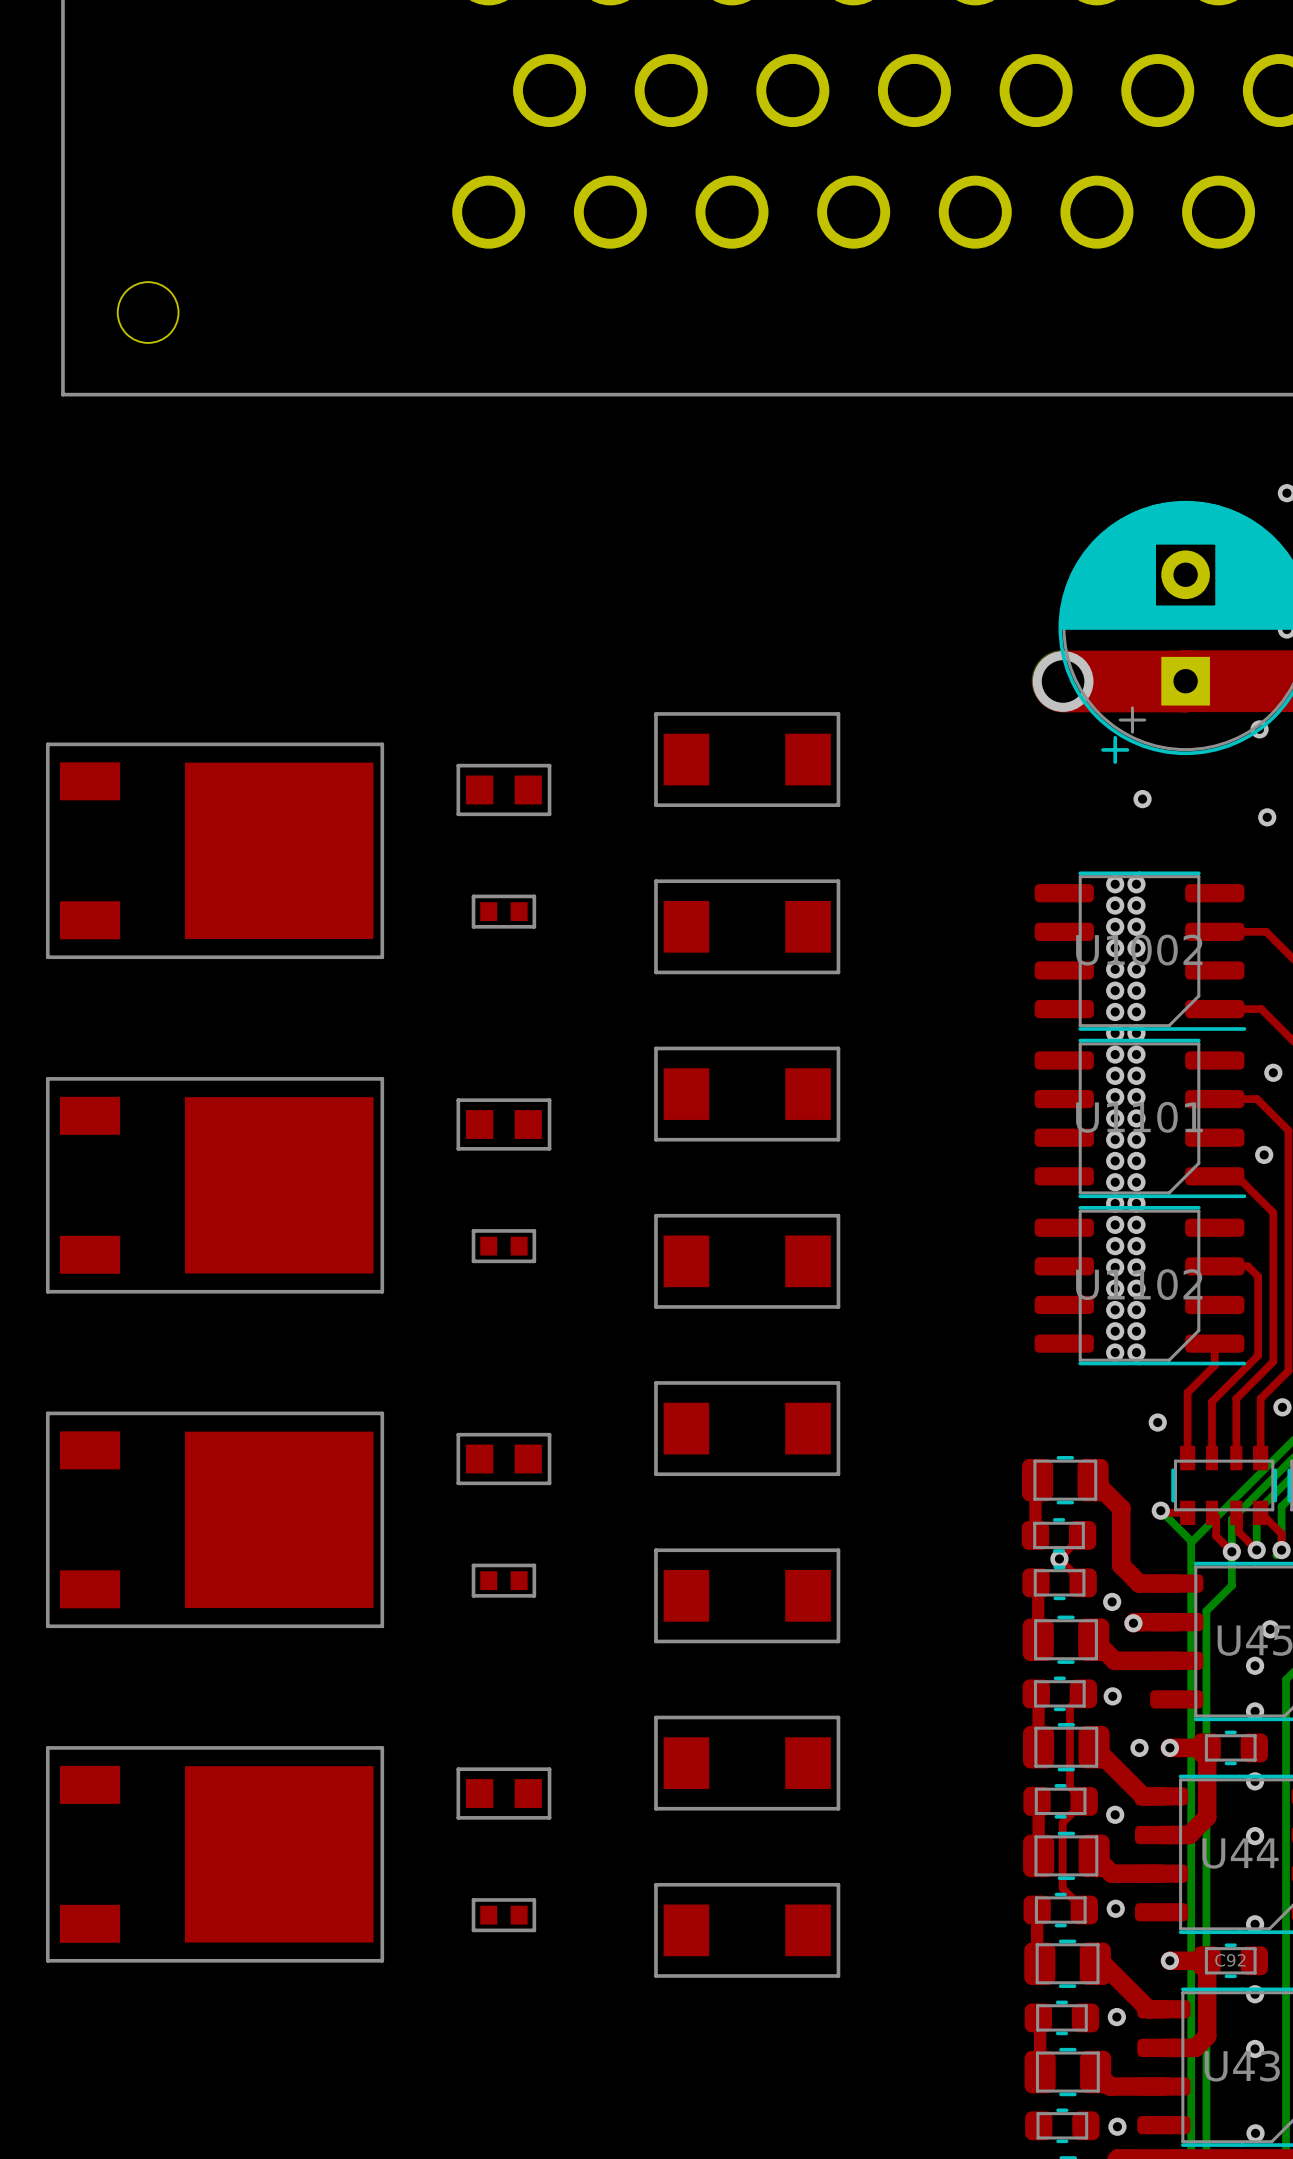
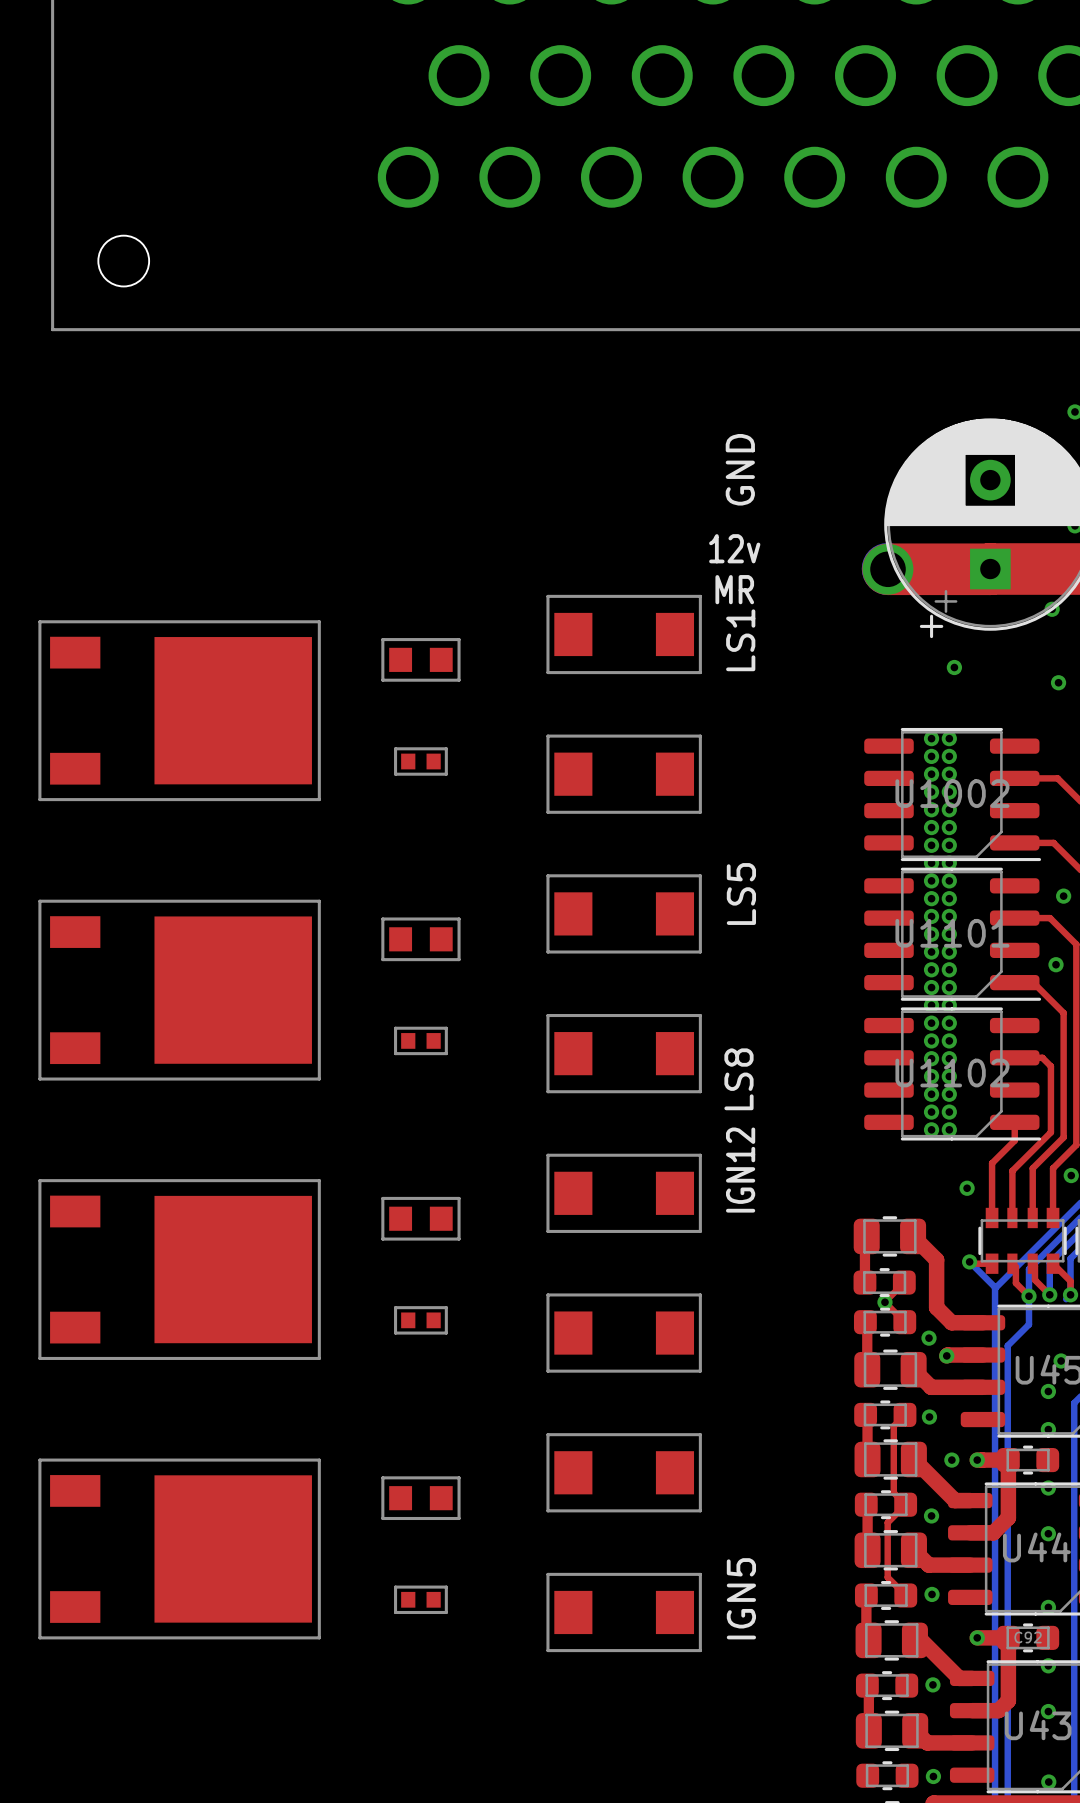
text: none -> GND (740, 469)
text: none -> 12v (734, 548)
text: none -> MR (734, 589)
text: none -> LS1 (740, 640)
text: none -> LS5 (741, 894)
text: none -> LS8 (738, 1079)
text: none -> IGN12 (740, 1170)
text: none -> IGN5 (741, 1598)

